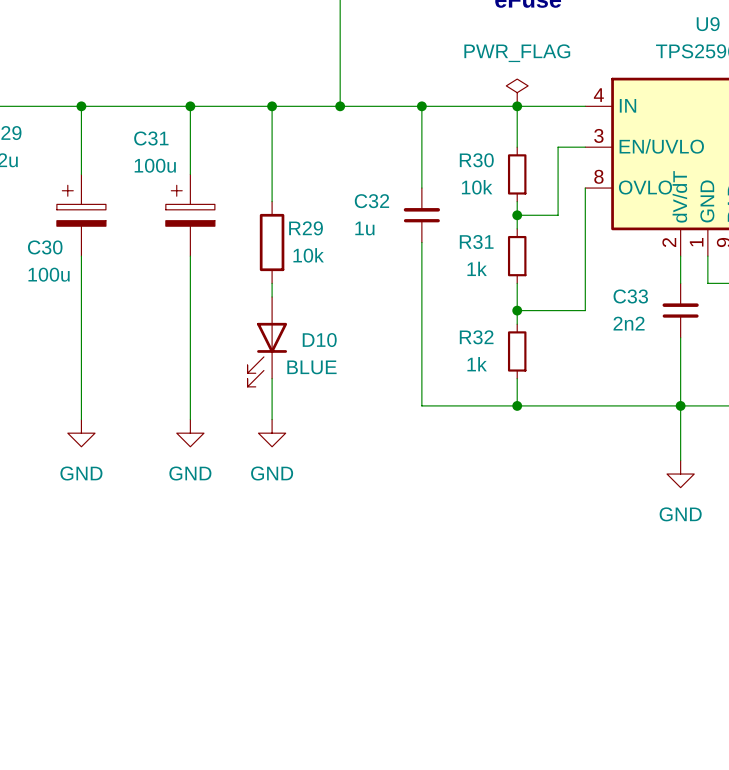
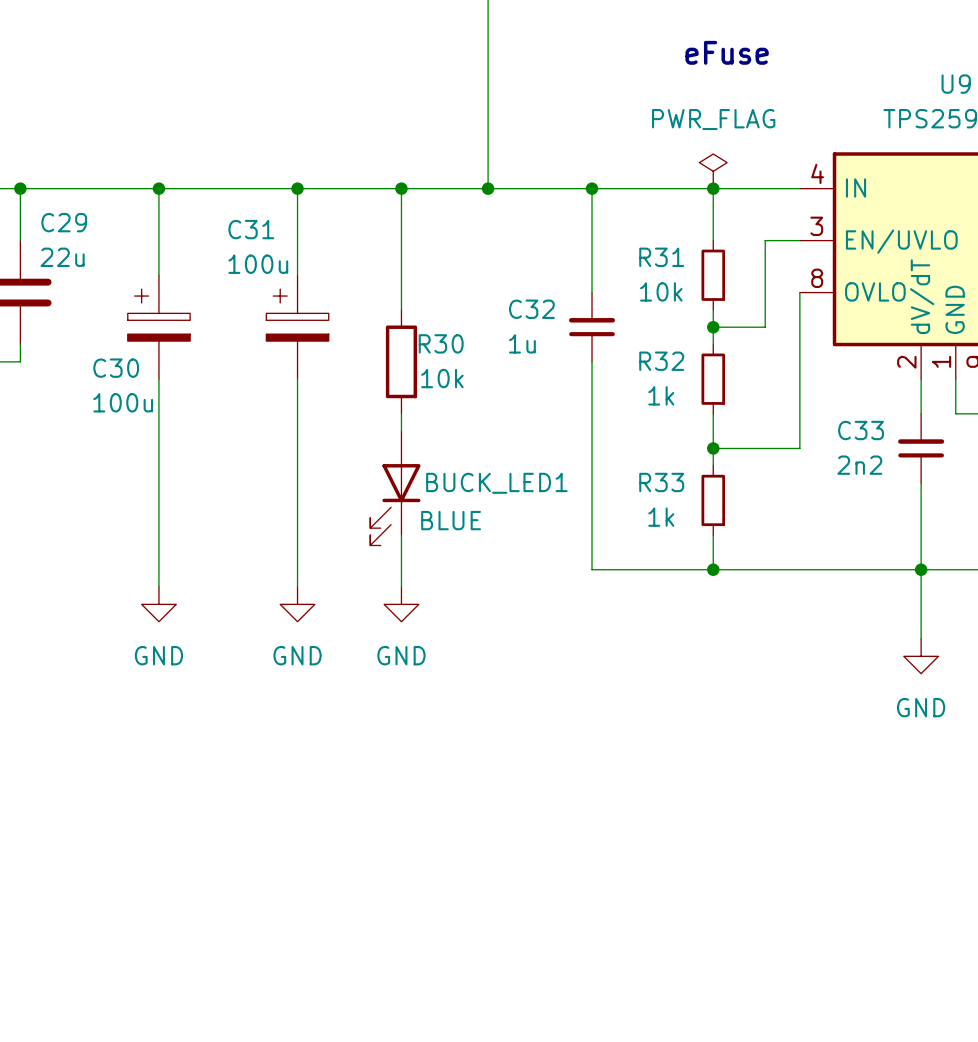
R30 name: R30 (476, 160) -> R31 (661, 257)
R29 name: R29 (306, 228) -> R30 (441, 343)
R31 name: R31 (476, 241) -> R32 (661, 361)
R32 name: R32 (476, 337) -> R33 (661, 482)
D10 name: D10 (319, 340) -> BUCK_LED1 (496, 483)

